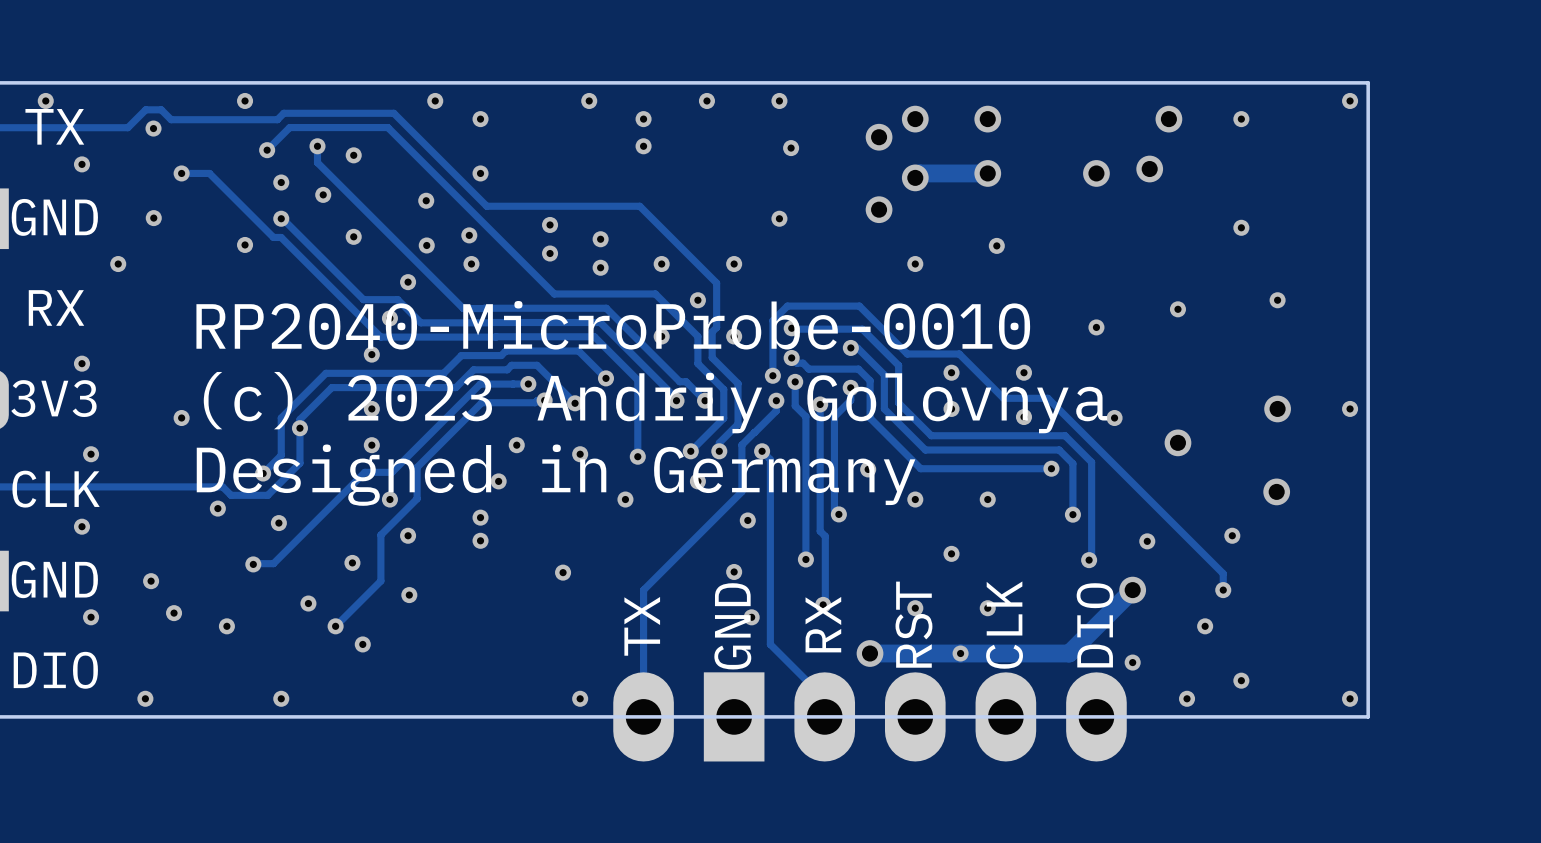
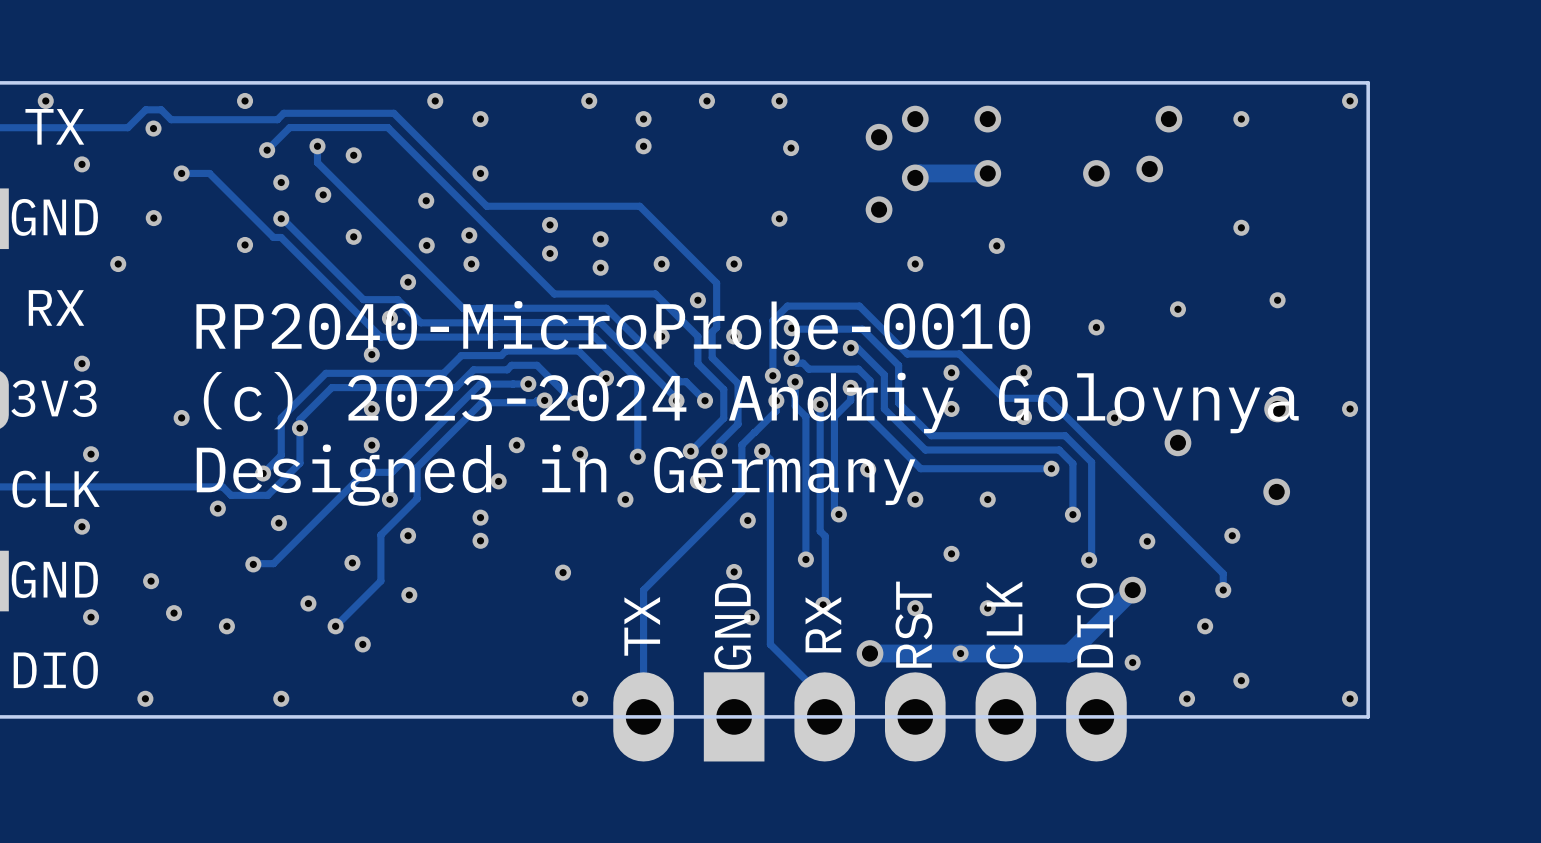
text: (c) 2023 Andriy Golovnya (655, 402) -> (c) 2023-2024 Andriy Golovnya (751, 402)

